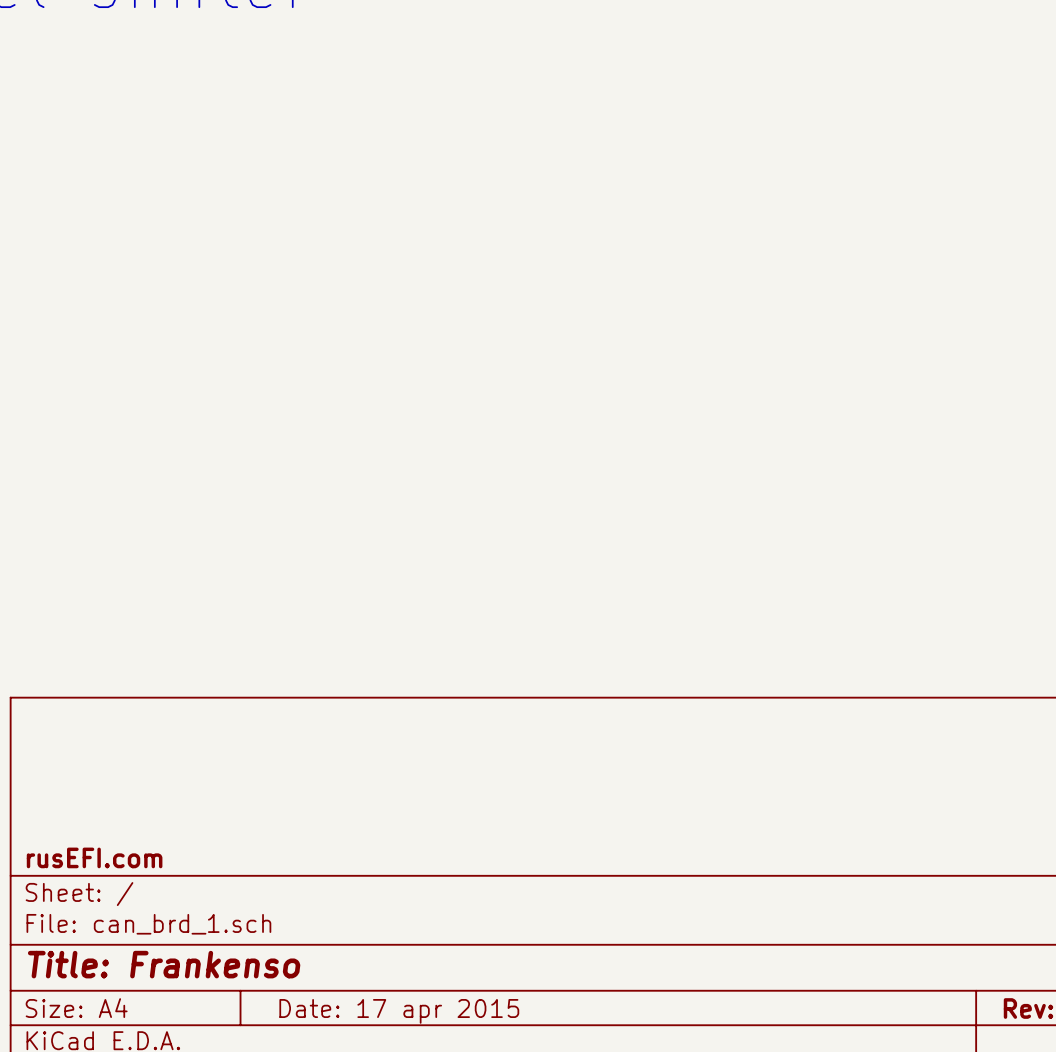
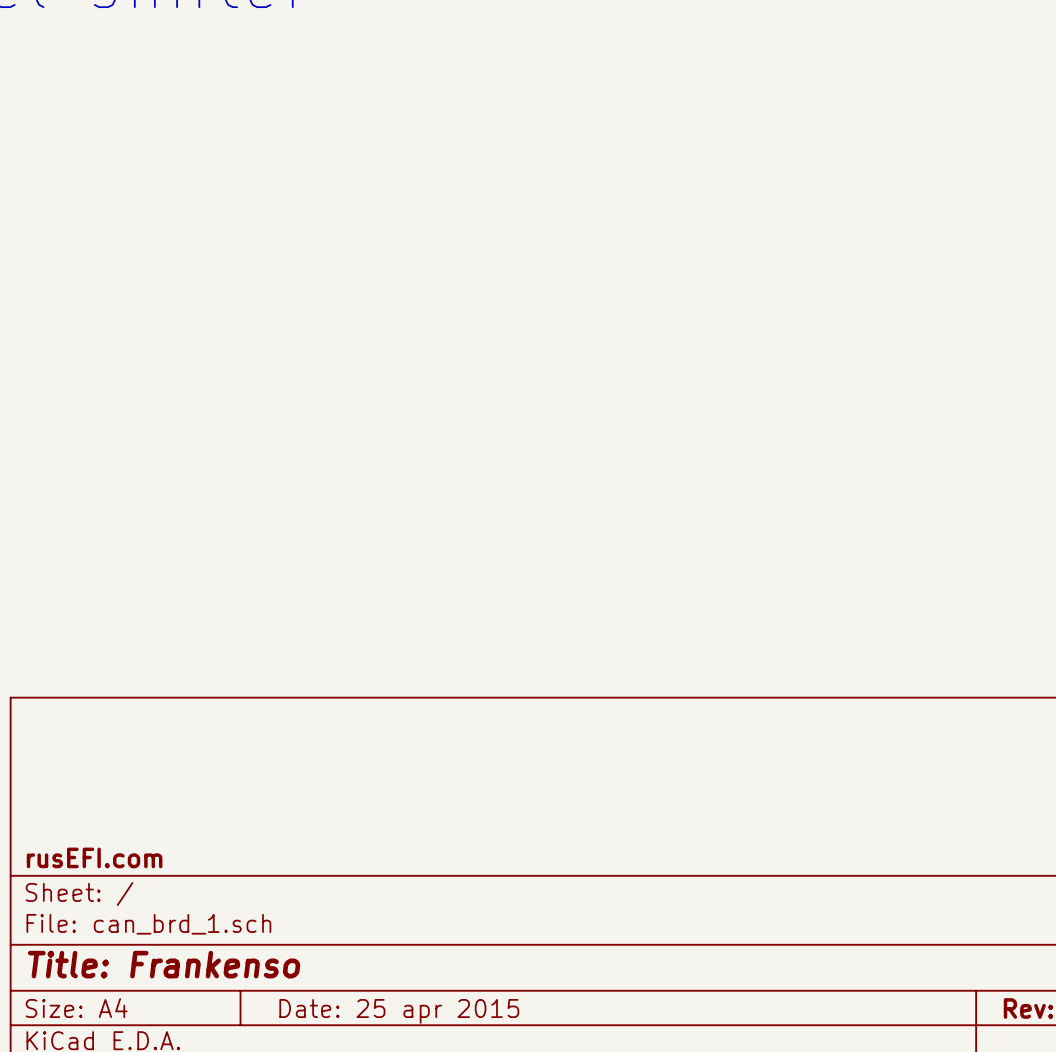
title block: Date: 17 apr 2015 (399, 1011) -> Date: 25 apr 2015 (399, 1011)

